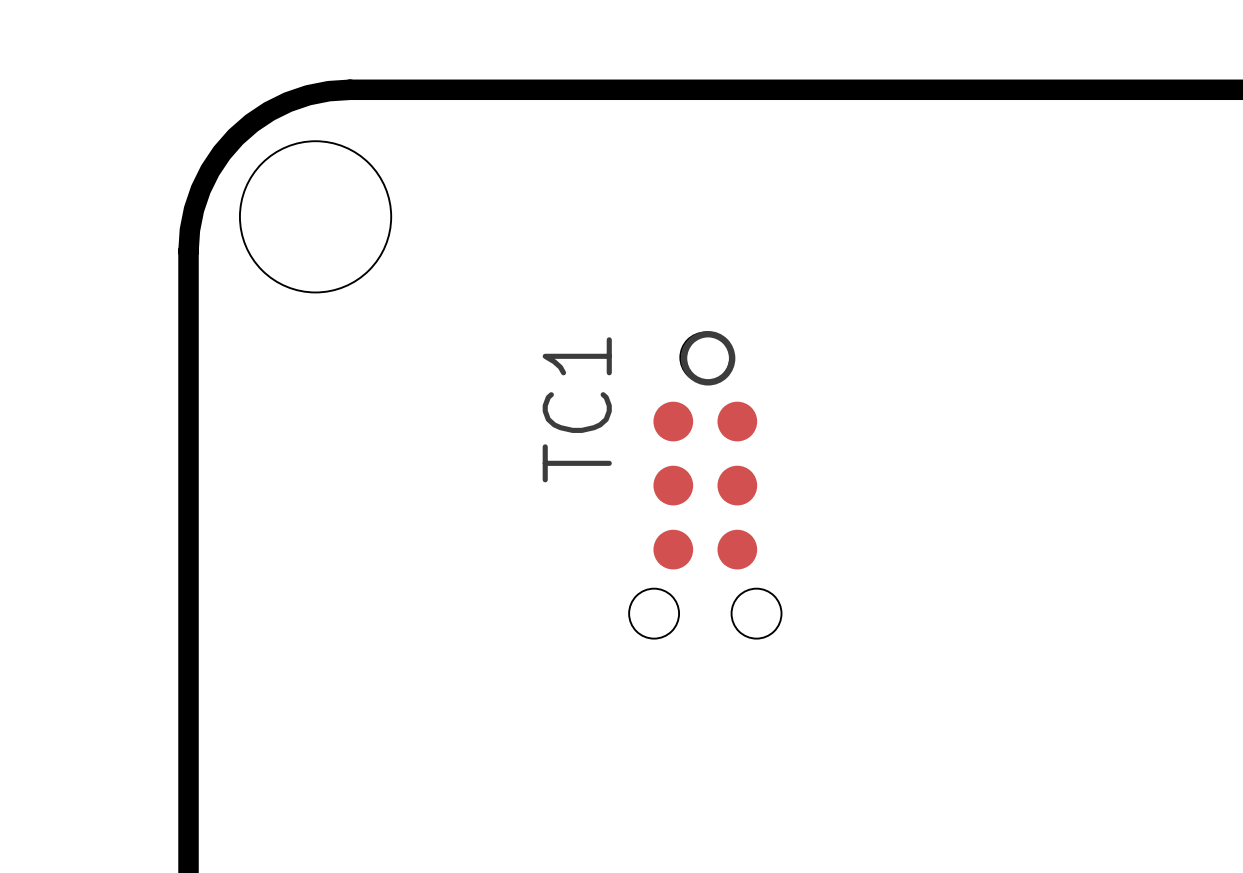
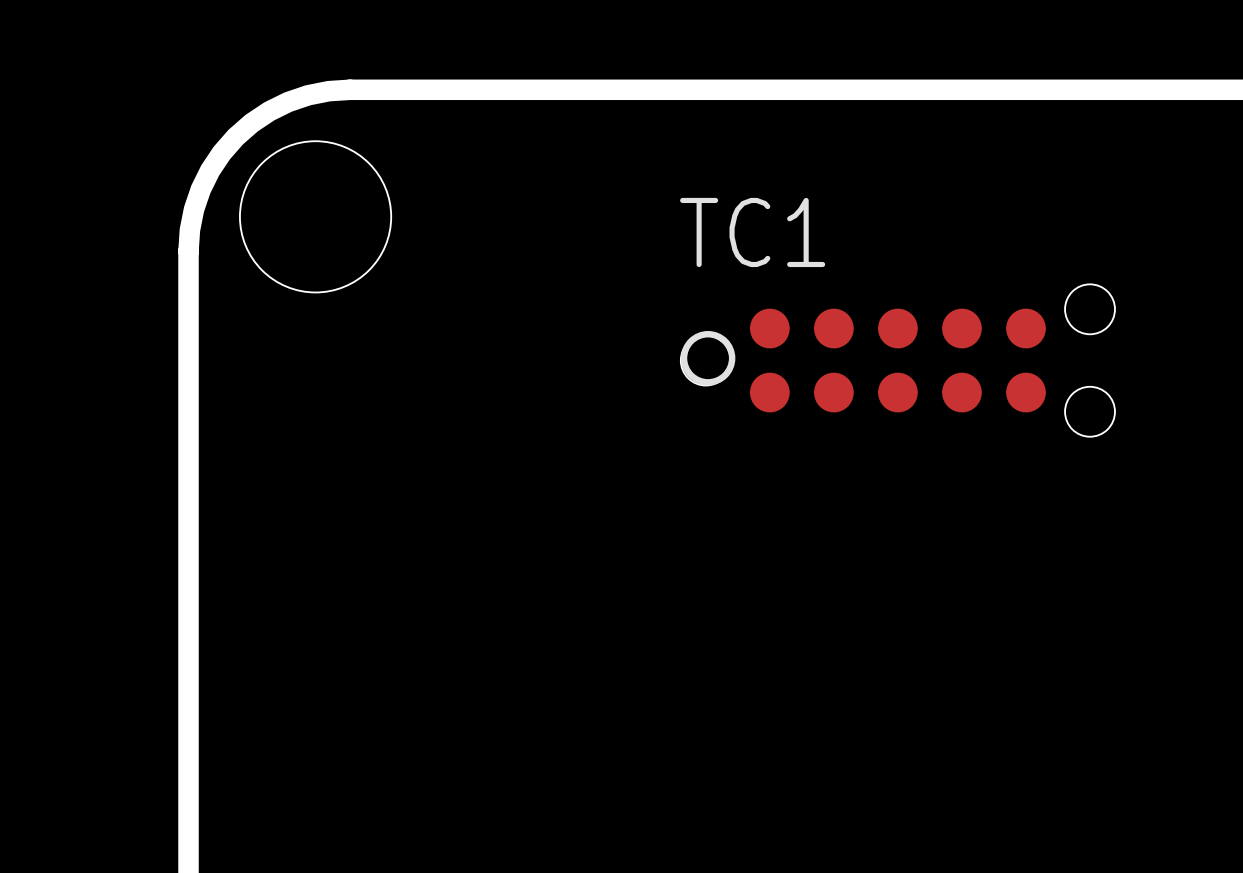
TC1 footprint: [629, 332, 782, 639] -> [680, 284, 1115, 437]

